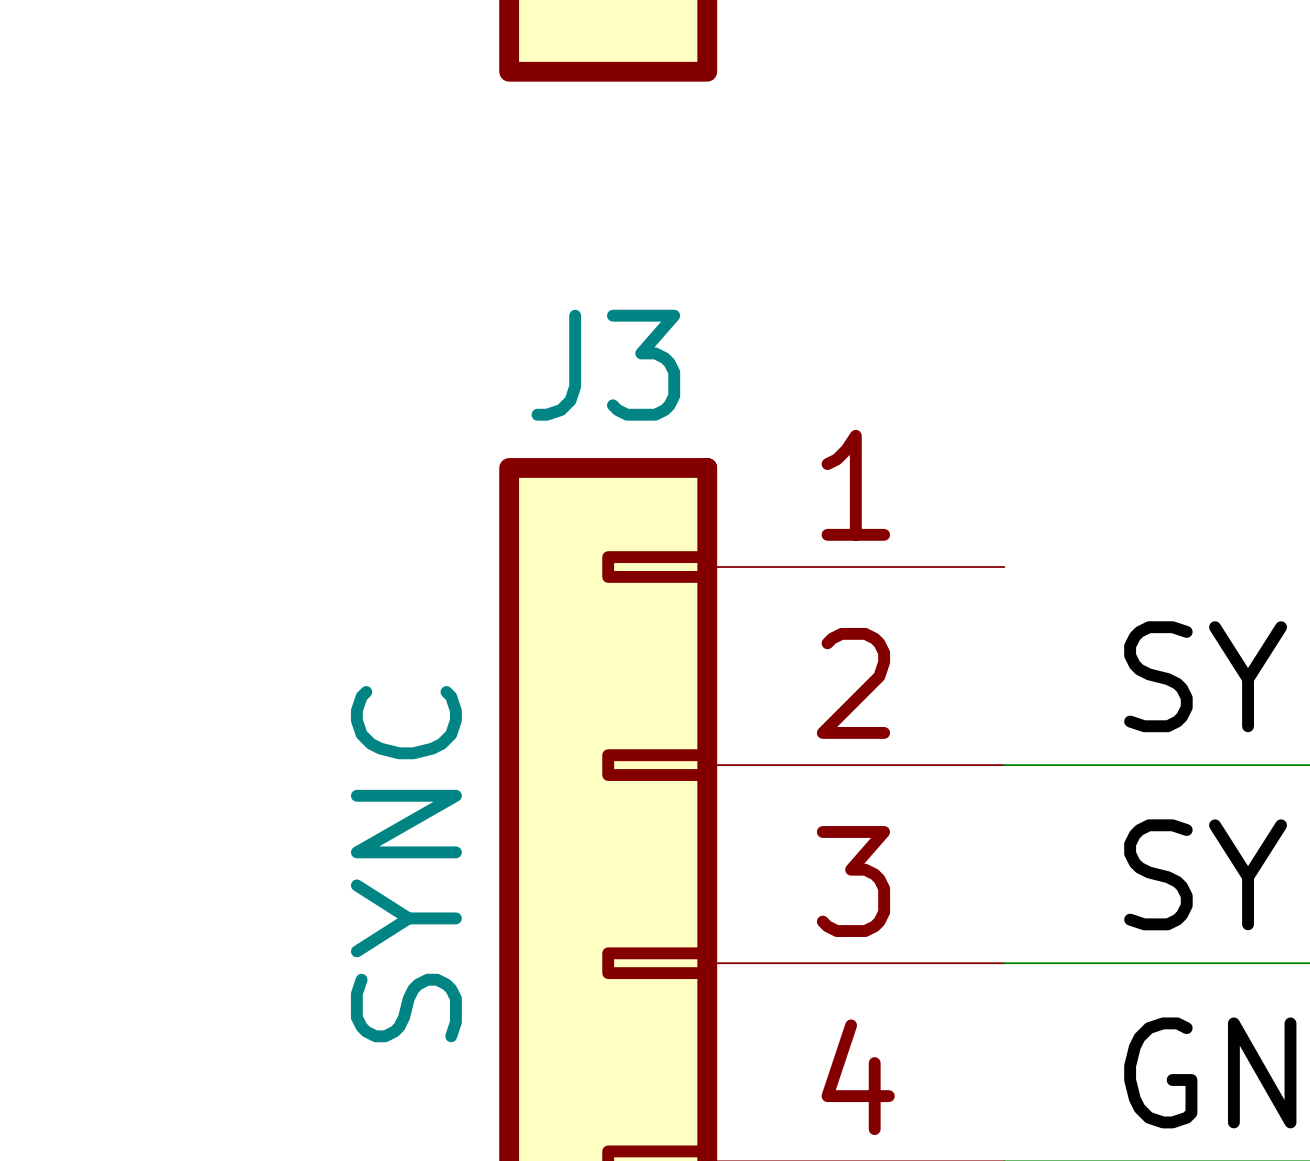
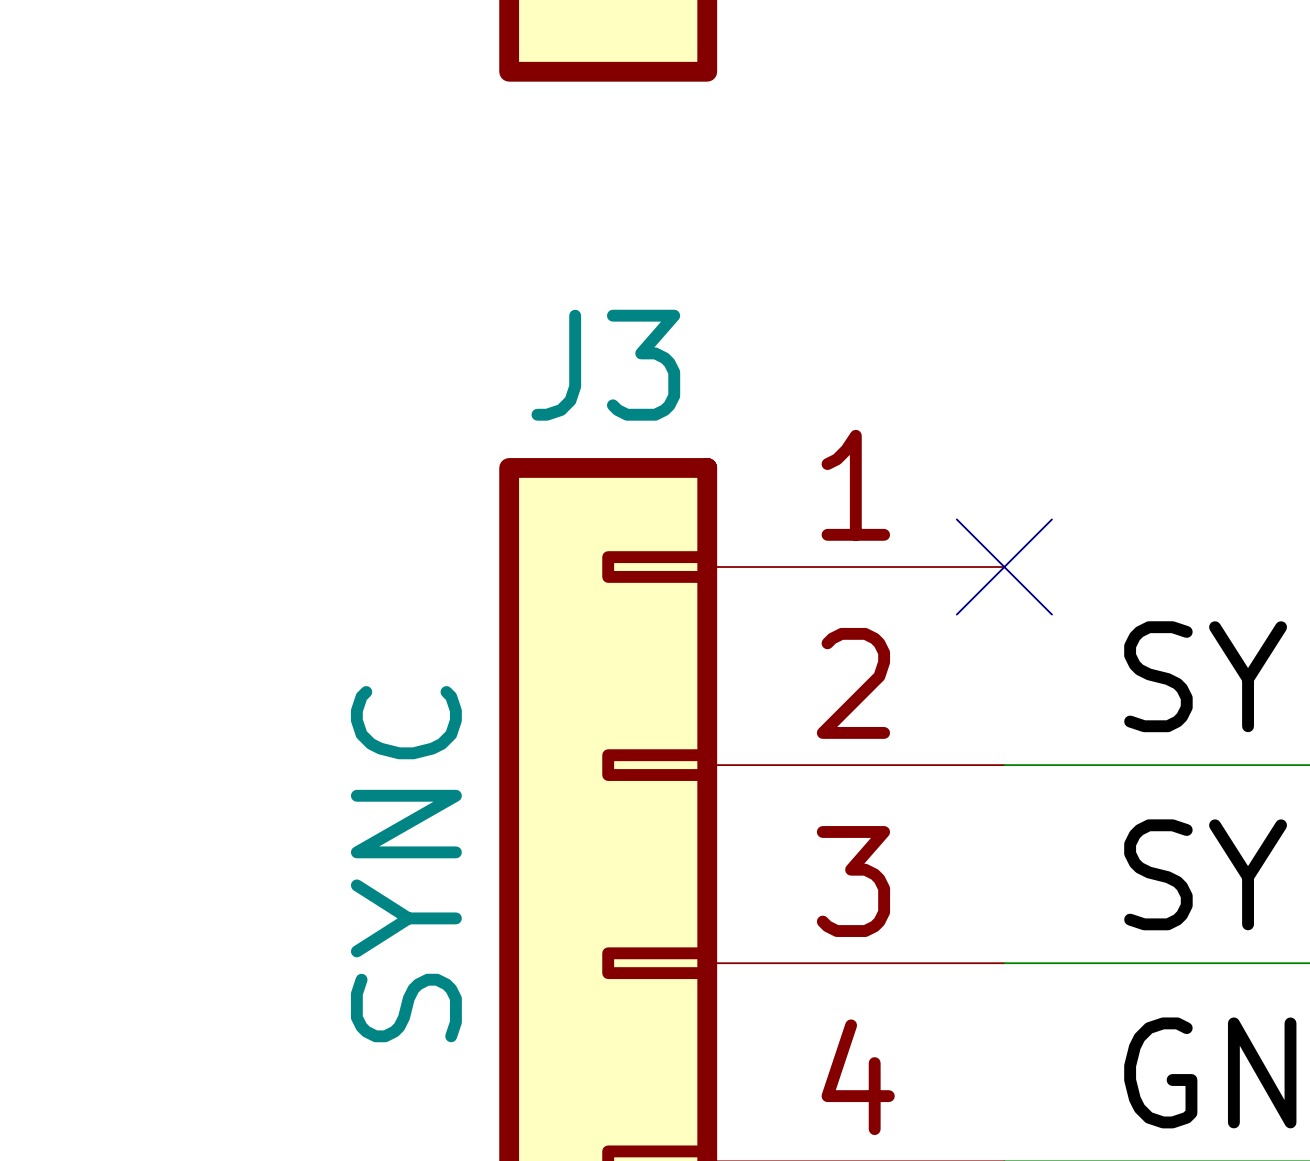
no-connect mark: none -> (1004, 567)

